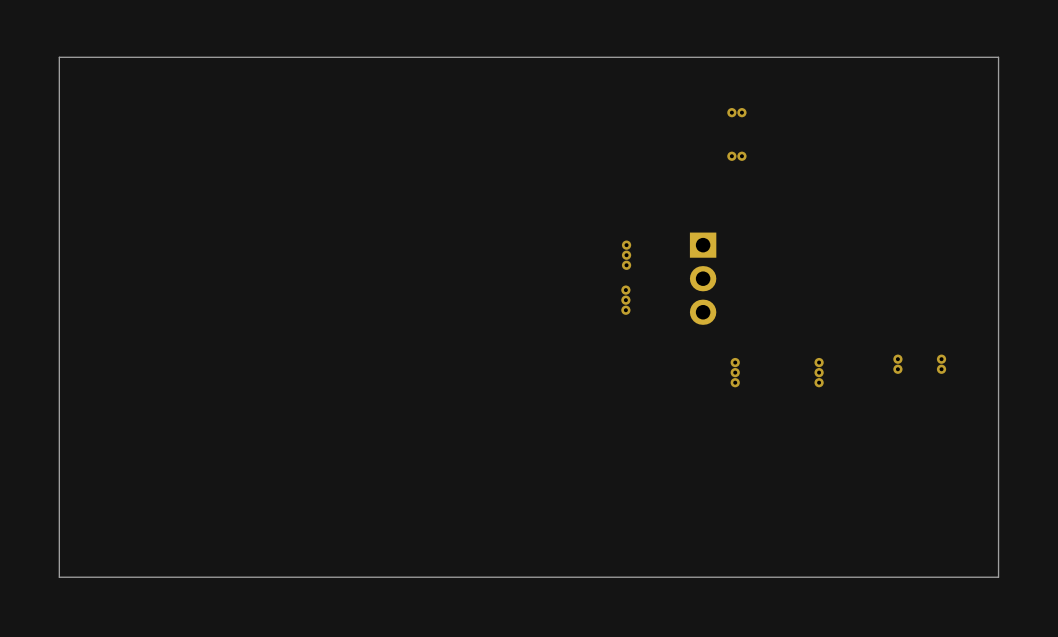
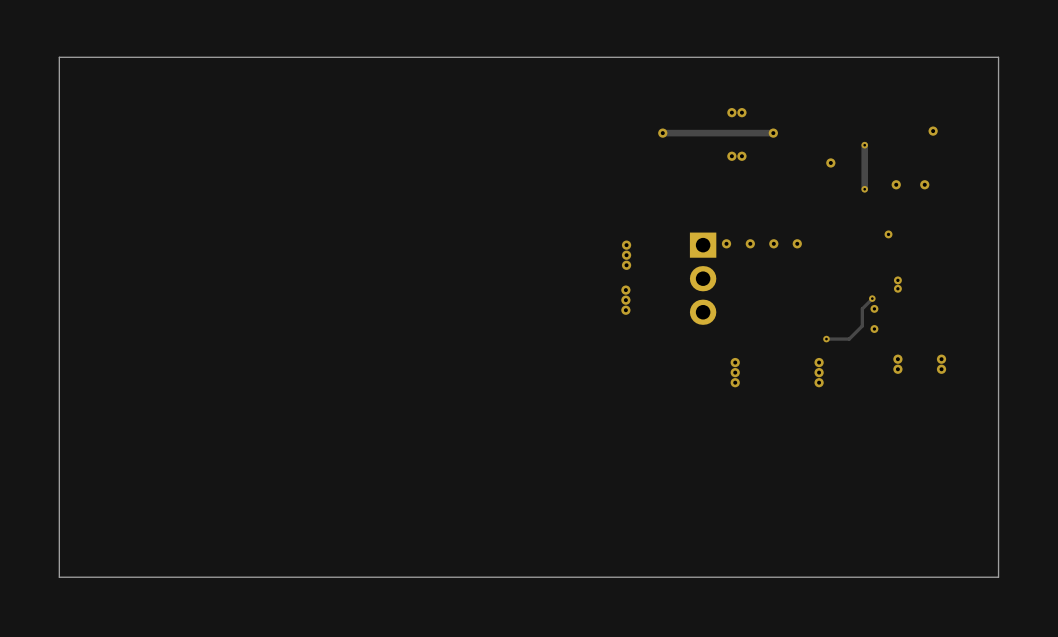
via: none -> (933, 131)
via: none -> (662, 133)
track: none -> (773, 133) (662, 133)
via: none -> (773, 133)
track: none -> (864, 144) (865, 190)
via: none -> (864, 145)
via: none -> (830, 162)
via: none -> (896, 184)
via: none -> (924, 184)
via: none -> (864, 189)
via: none -> (888, 234)
via: none -> (726, 243)
via: none -> (750, 243)
via: none -> (773, 243)
via: none -> (797, 243)
via: none -> (897, 280)
via: none -> (897, 288)
track: none -> (872, 298) (862, 308) (862, 325) (849, 339) (826, 339)
via: none -> (872, 298)
via: none -> (874, 308)
via: none -> (874, 329)
via: none -> (826, 339)

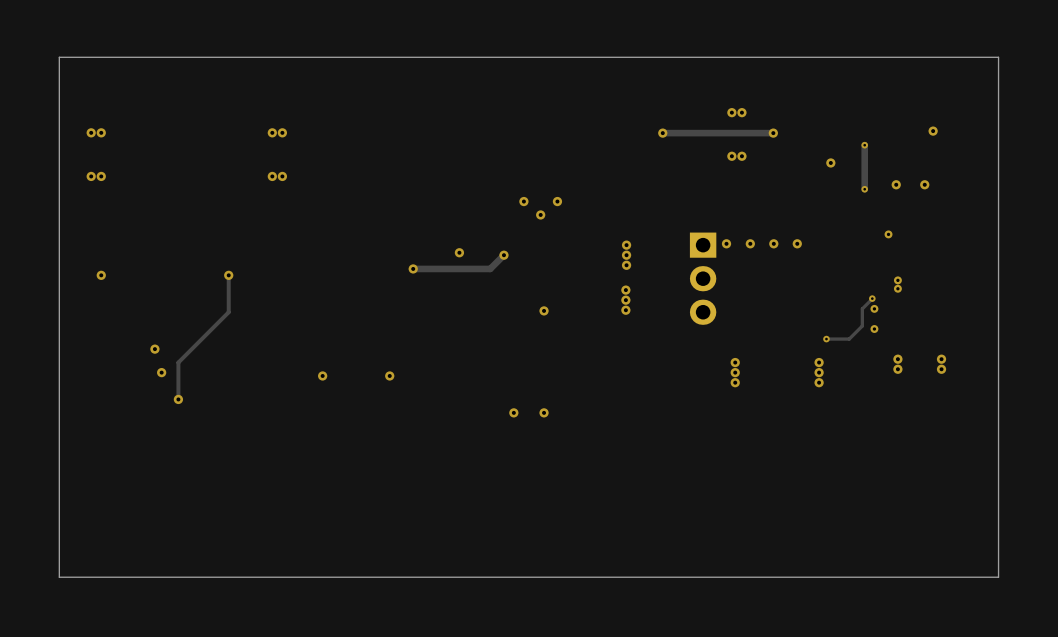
via: none -> (91, 132)
via: none -> (101, 132)
via: none -> (272, 132)
via: none -> (282, 132)
via: none -> (91, 176)
via: none -> (101, 176)
via: none -> (272, 176)
via: none -> (282, 176)
via: none -> (523, 201)
via: none -> (557, 201)
via: none -> (540, 214)
via: none -> (459, 252)
track: none -> (503, 255) (490, 268) (413, 268)
via: none -> (503, 255)
via: none -> (413, 268)
via: none -> (101, 275)
track: none -> (228, 275) (228, 312) (178, 362) (178, 399)
via: none -> (228, 275)
via: none -> (544, 310)
via: none -> (154, 349)
via: none -> (161, 372)
via: none -> (322, 375)
via: none -> (389, 375)
via: none -> (178, 399)
via: none -> (513, 412)
via: none -> (544, 412)

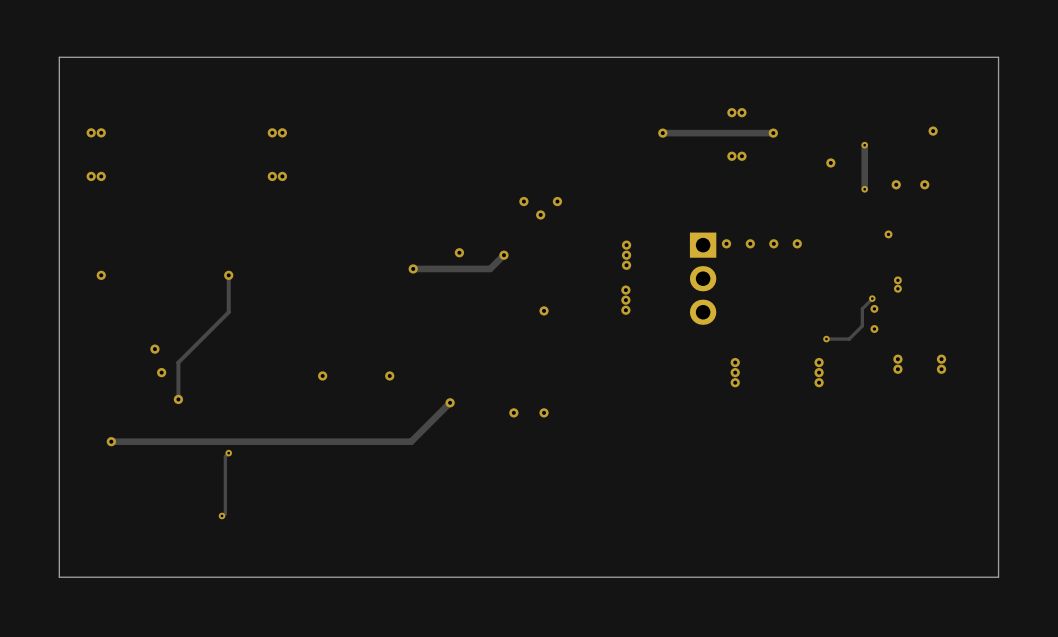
track: none -> (450, 402) (411, 441) (111, 441)
via: none -> (450, 402)
via: none -> (111, 441)
track: none -> (228, 453) (225, 456) (225, 513) (222, 515)
via: none -> (228, 453)
via: none -> (222, 515)

